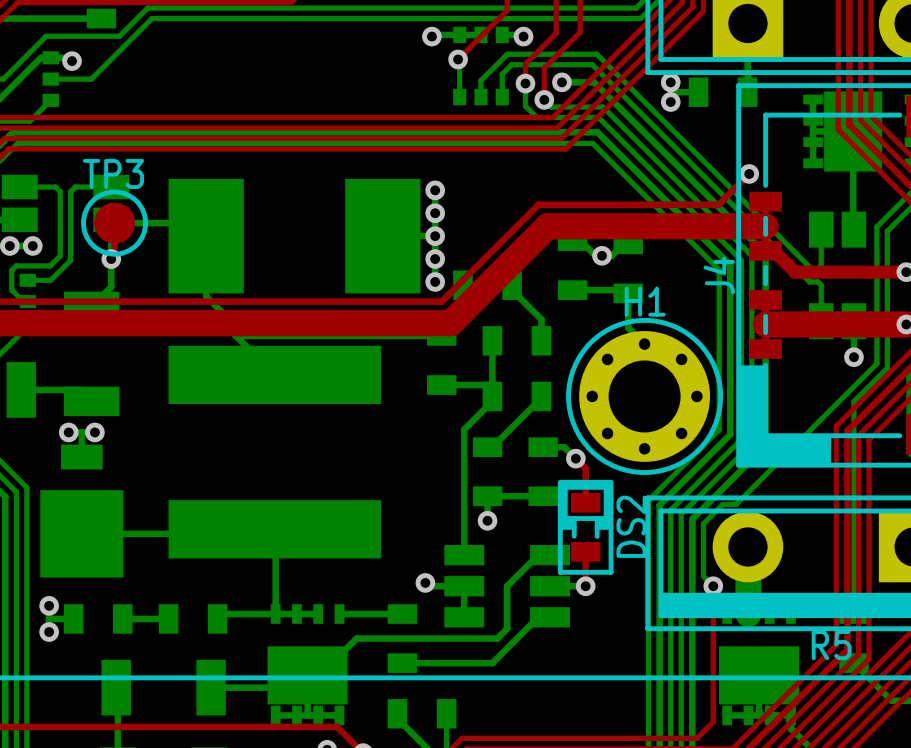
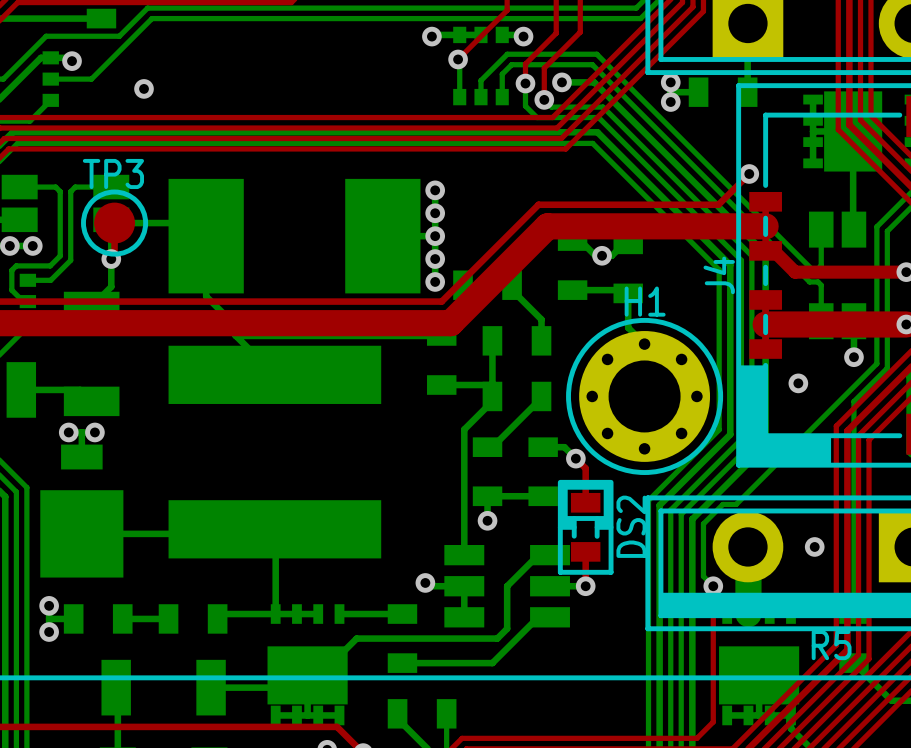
via: none -> (144, 88)
via: none -> (798, 383)
via: none -> (814, 546)

